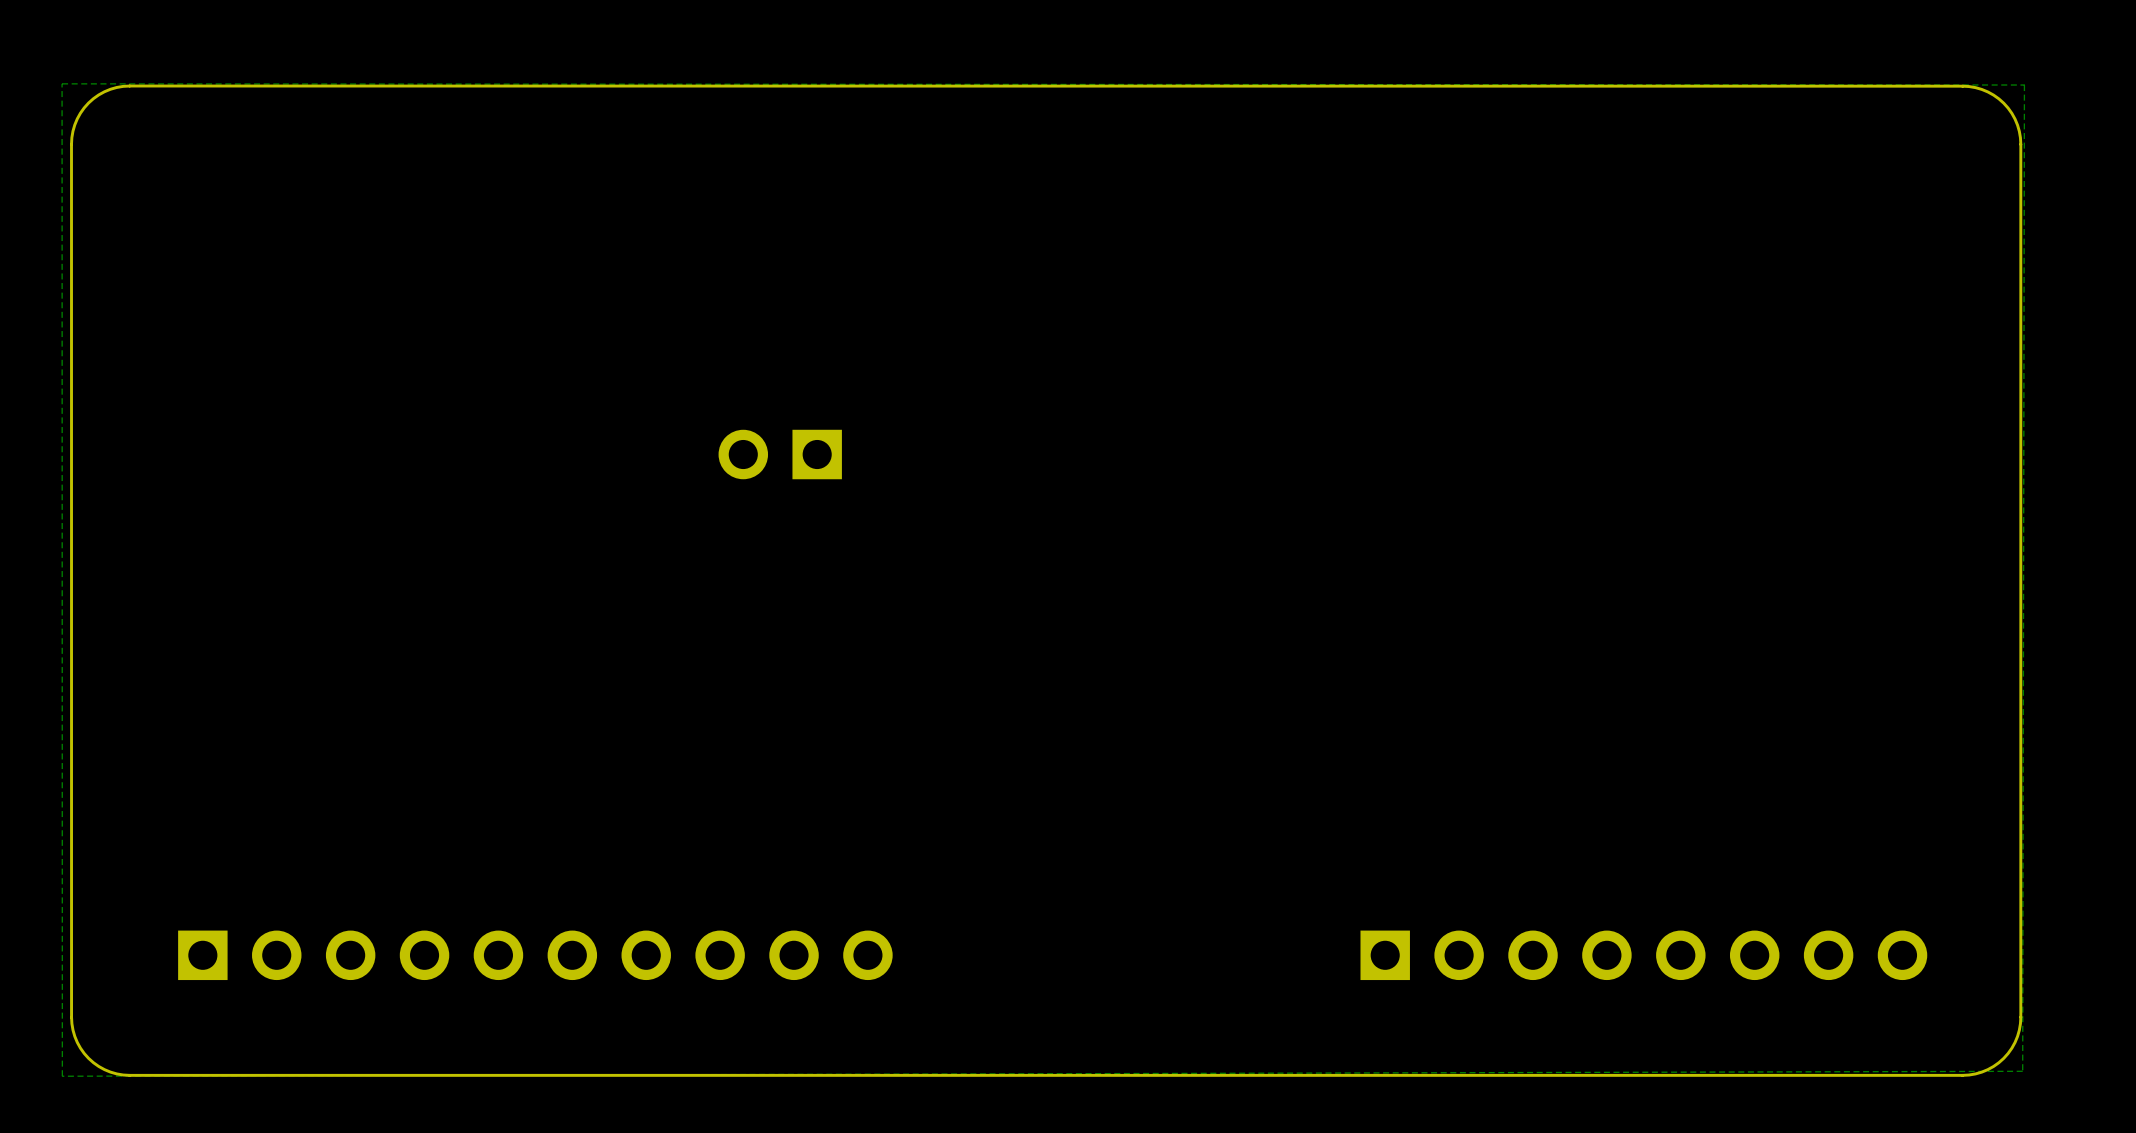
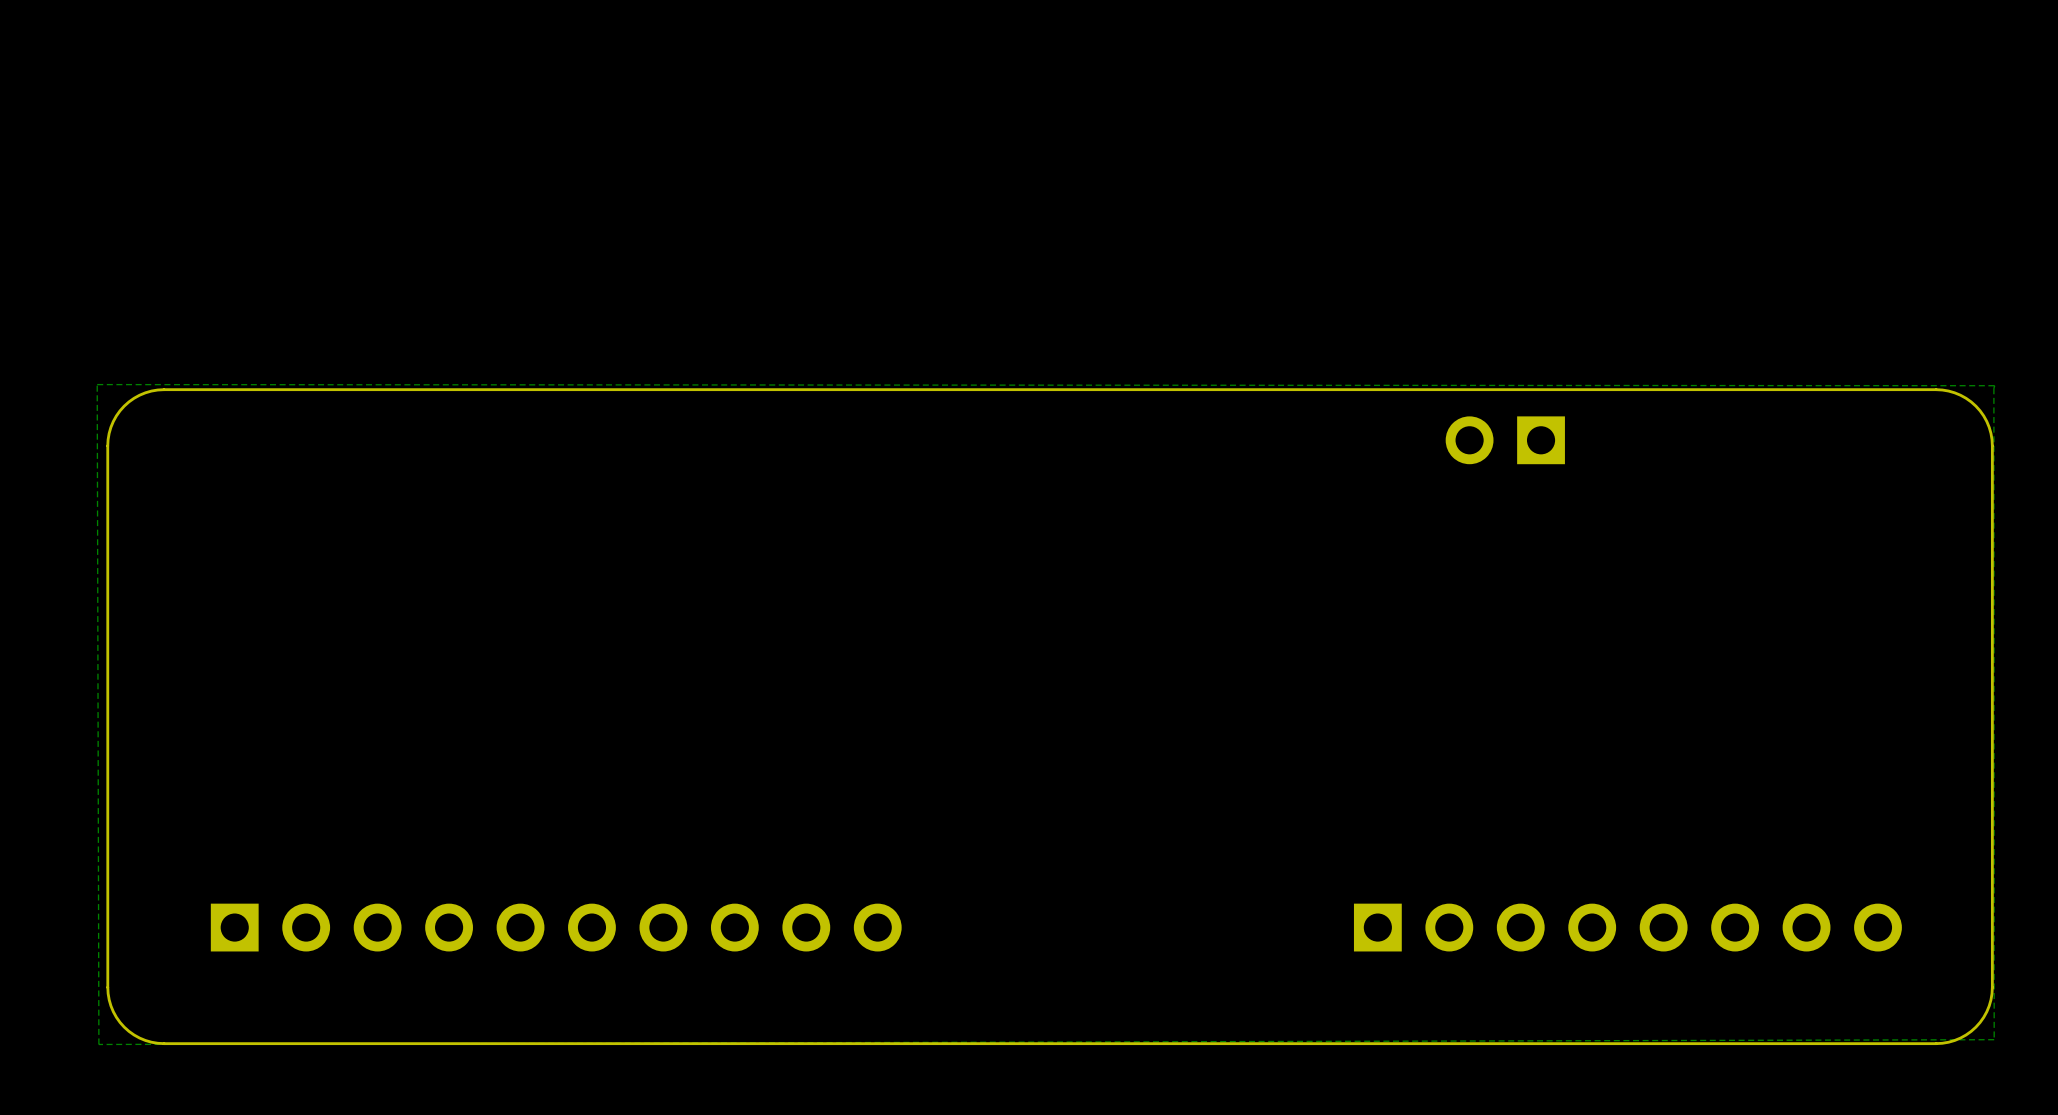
zone outline: (2024, 85) (62, 83) (62, 1076) -> (1994, 1039) (1994, 385) (97, 384) (98, 1044)
zone outline: (2024, 85) (2022, 1071) -> none
part: none -> (1505, 440)
part: (780, 454) -> none
board edge: (2020, 457) (2020, 137) (2015, 119) (2003, 103) (1993, 95) (1975, 87) (129, 86) (110, 89) (93, 98) (80, 113) (71, 137) (71, 457) -> (1992, 445) (1986, 421) (1975, 406) (1960, 395) (1936, 389) (164, 389) (145, 392) (124, 406) (110, 427) (107, 445)

